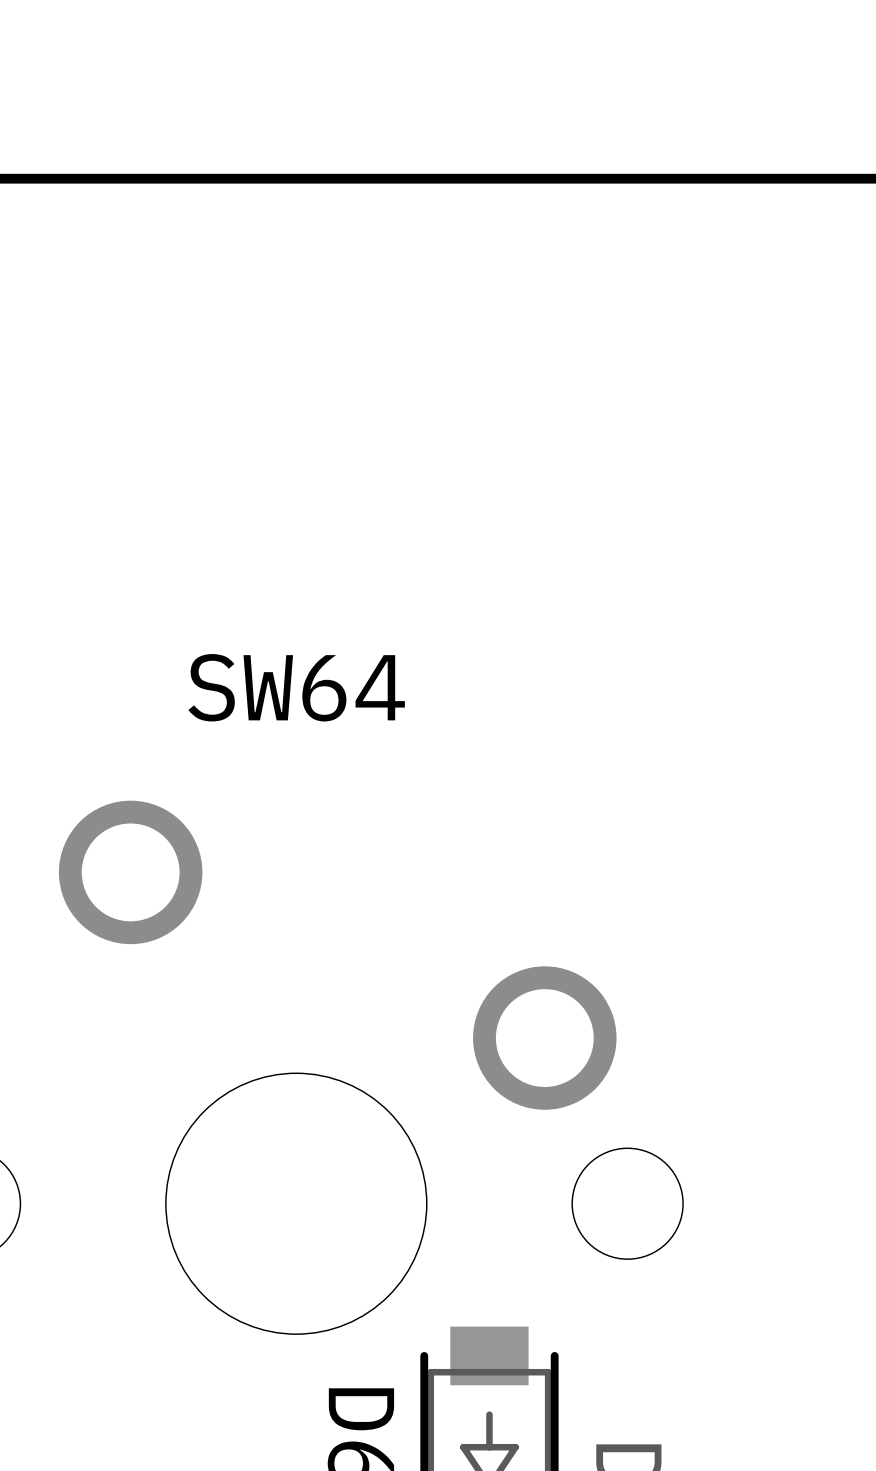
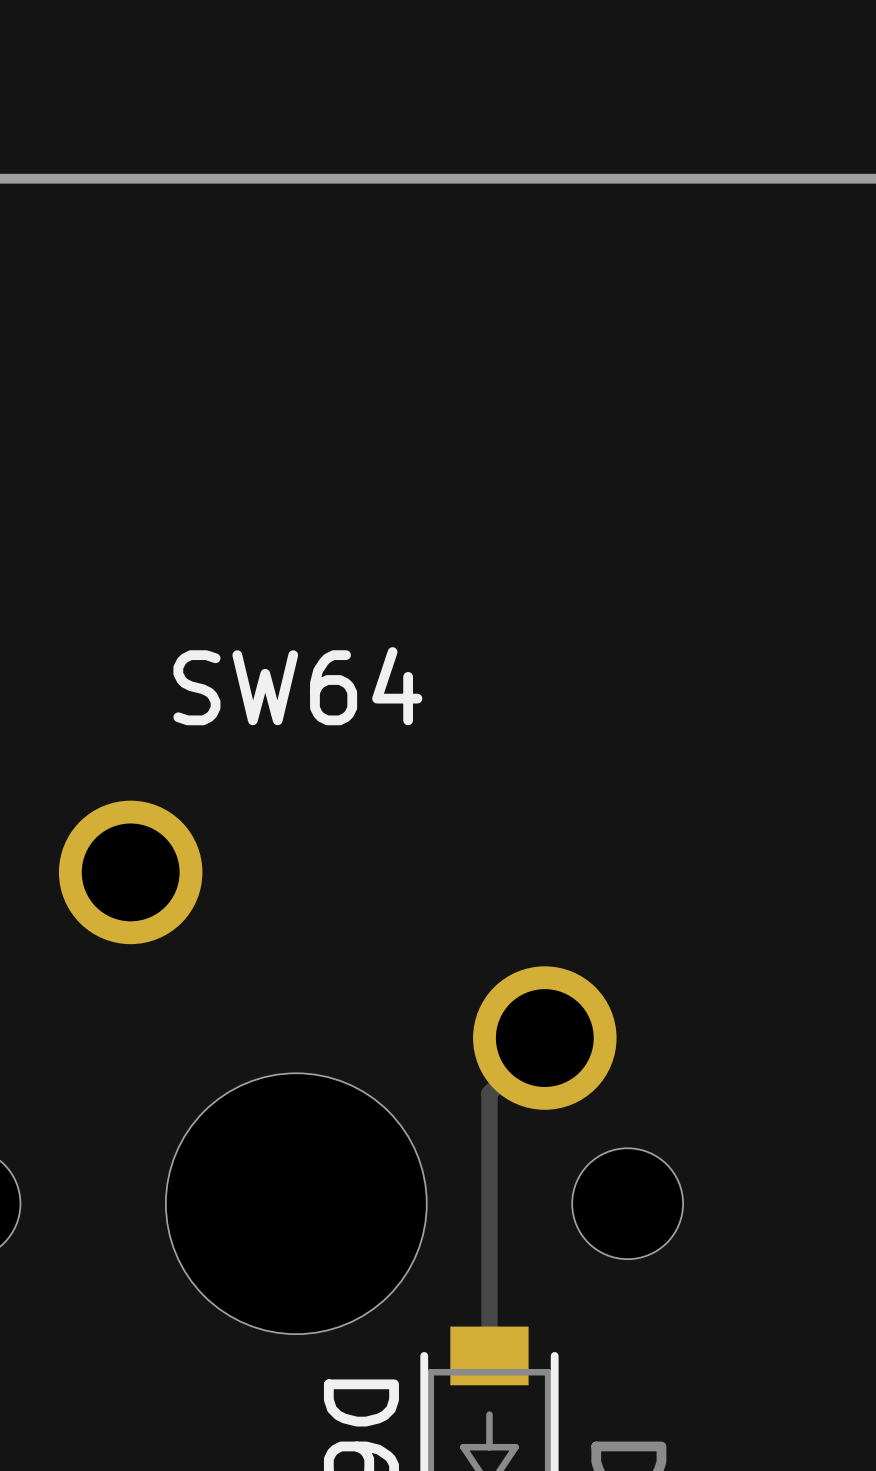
track: none -> (544, 1038) (489, 1093) (489, 1355)

